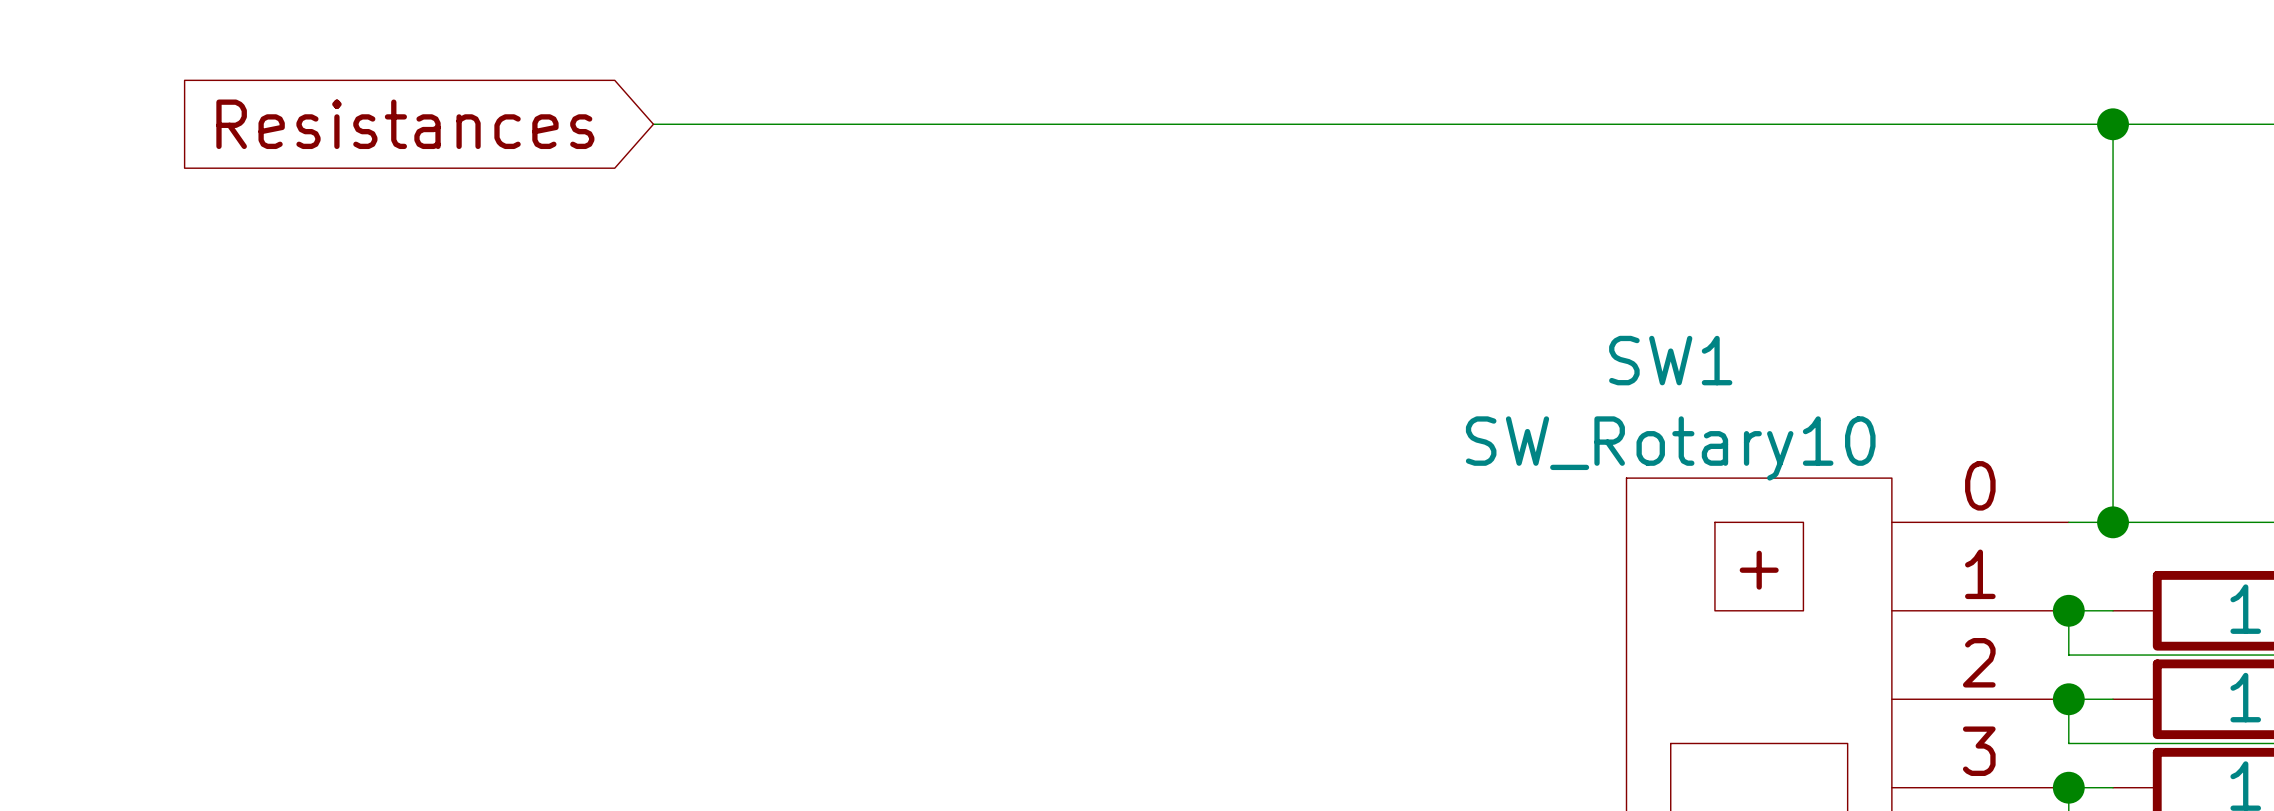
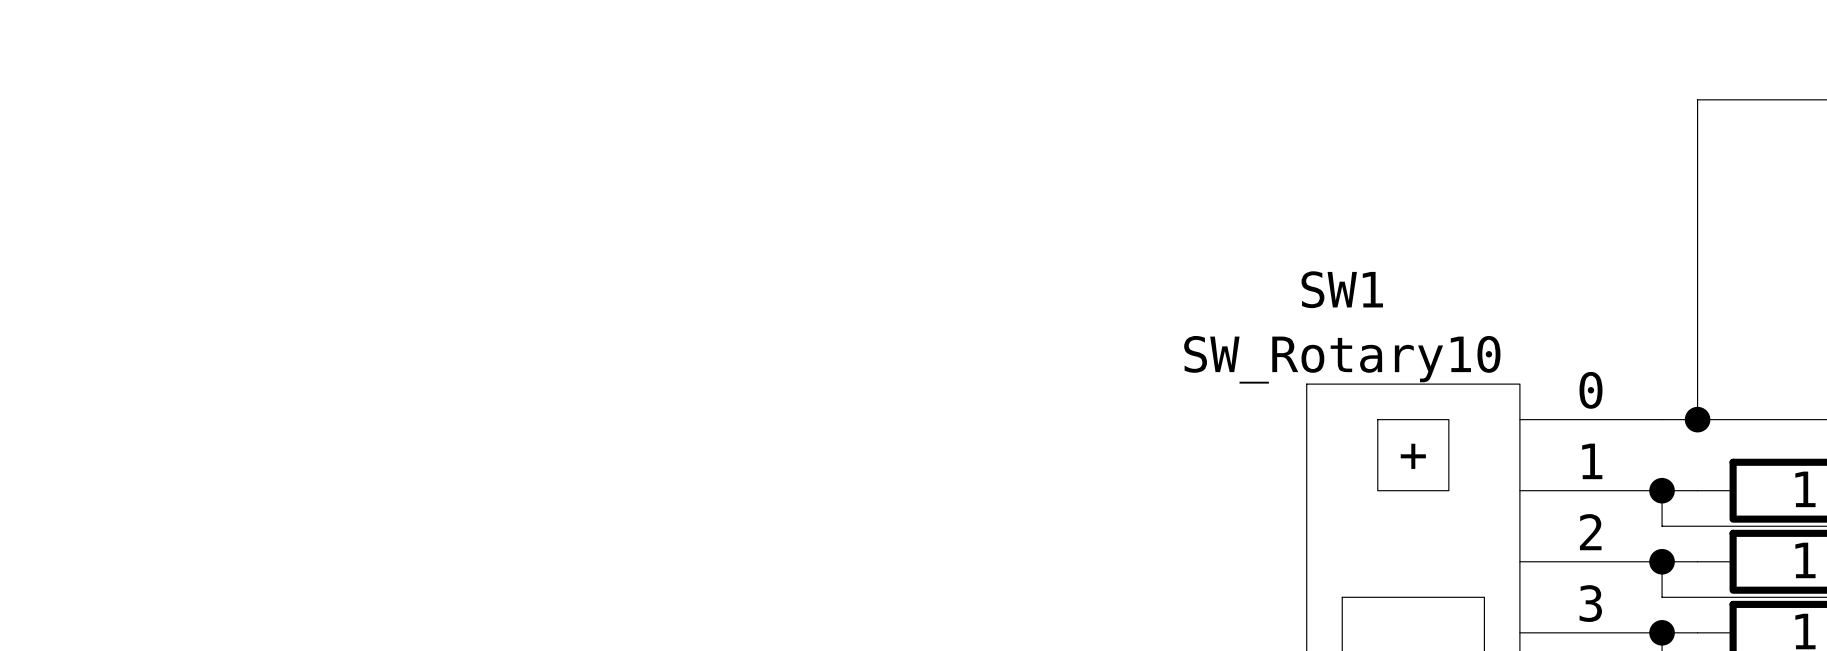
global label: Resistances (405, 124) -> none
wire: (653, 124) (2113, 124) -> none
junction: (2113, 124) -> none

